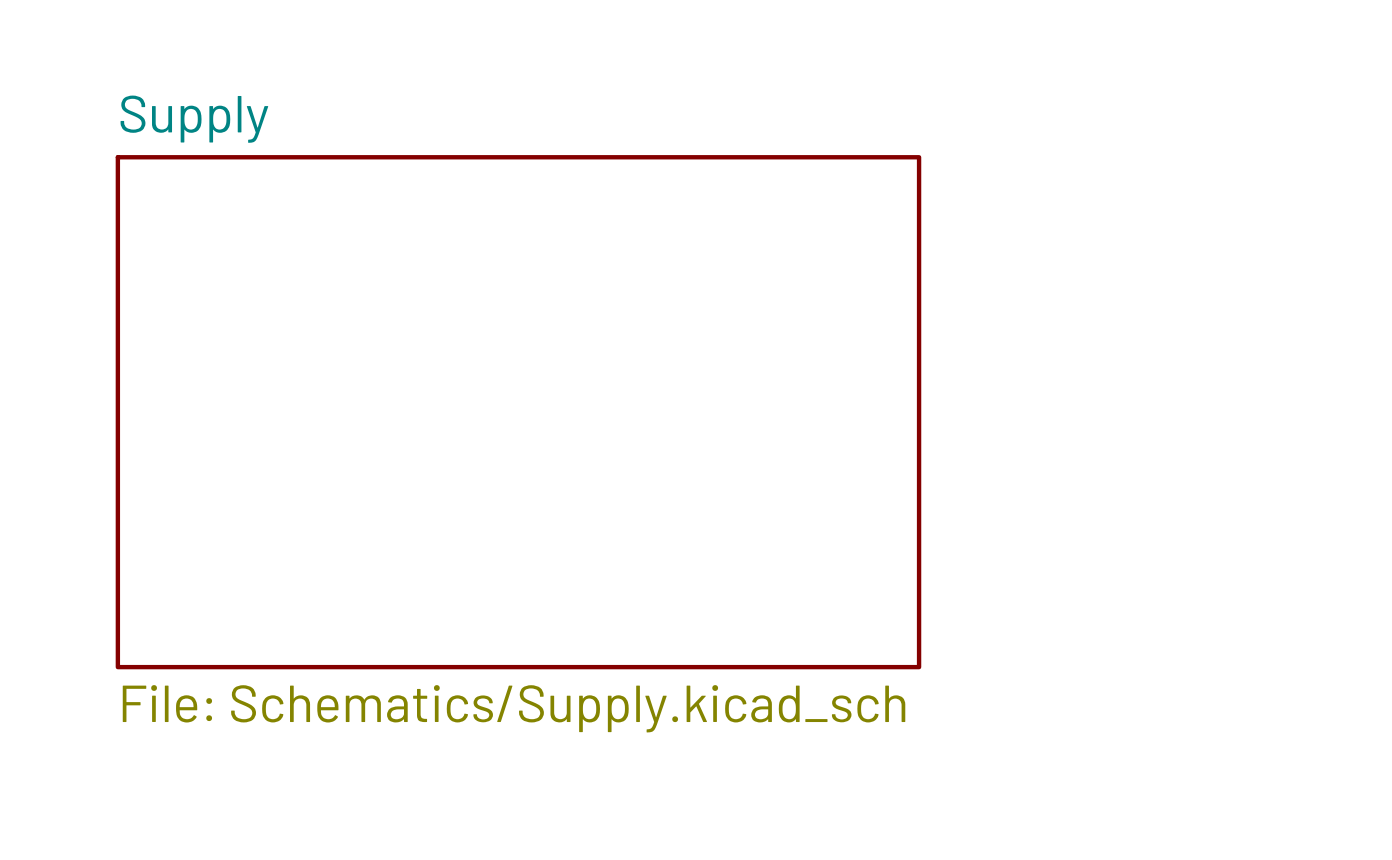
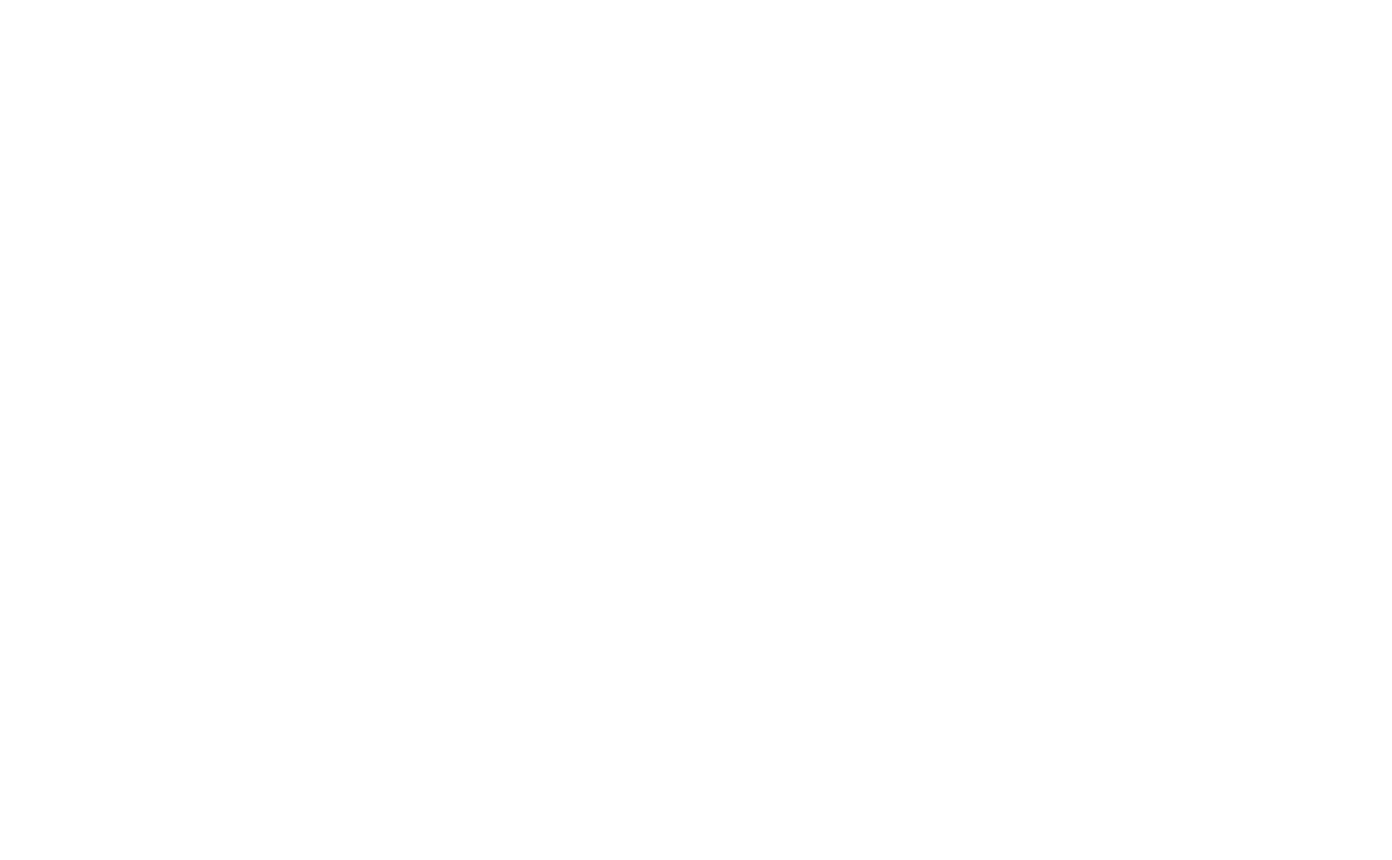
sheet Supply: File: Schematics/Supply.kicad_sch (518, 412) -> none

